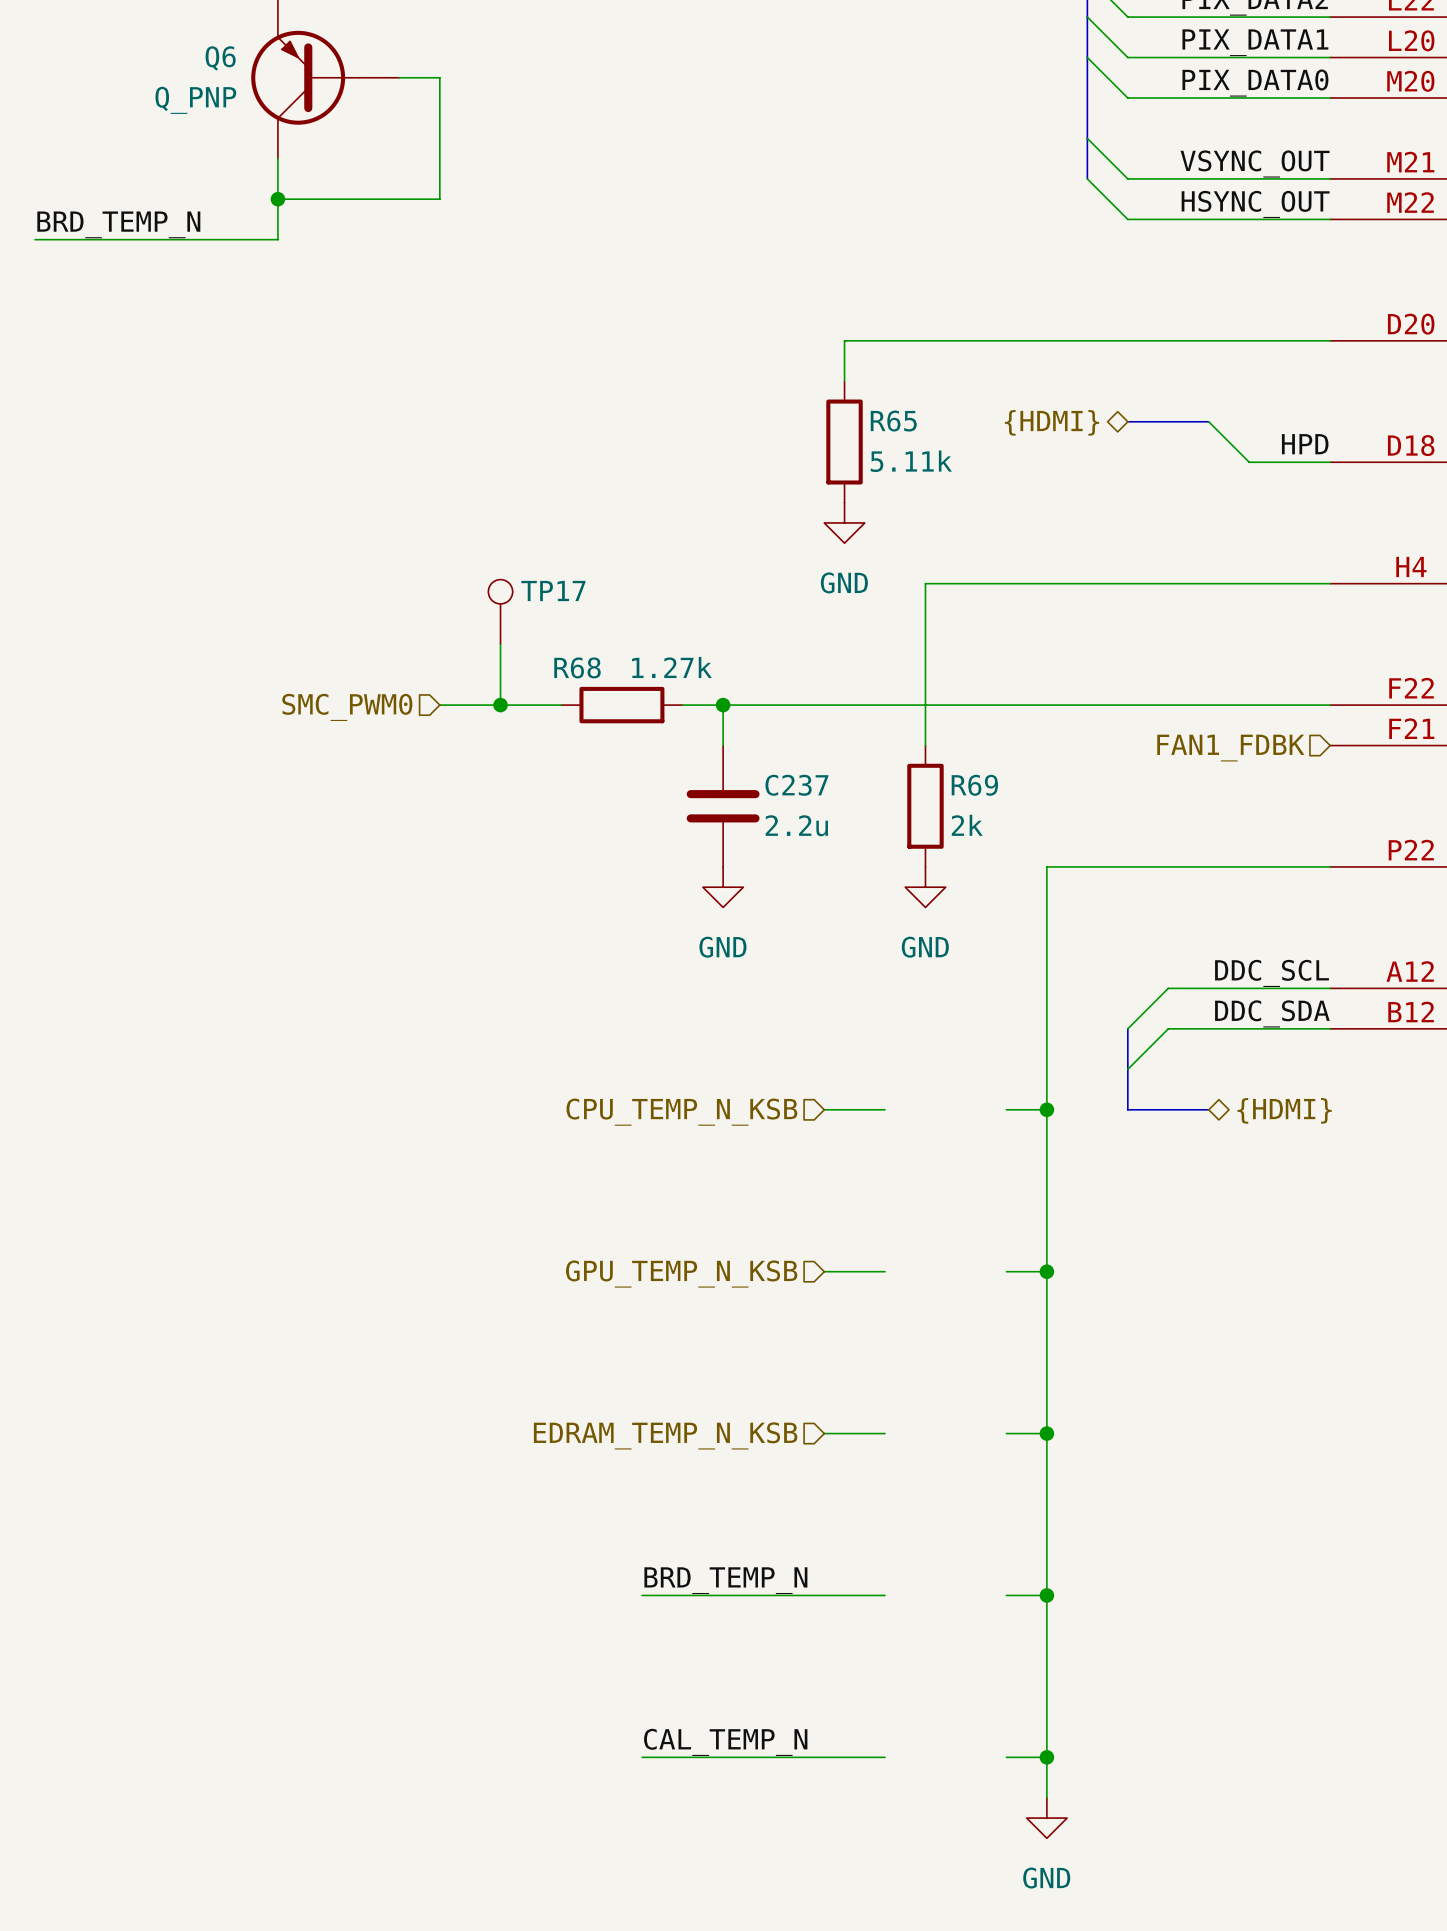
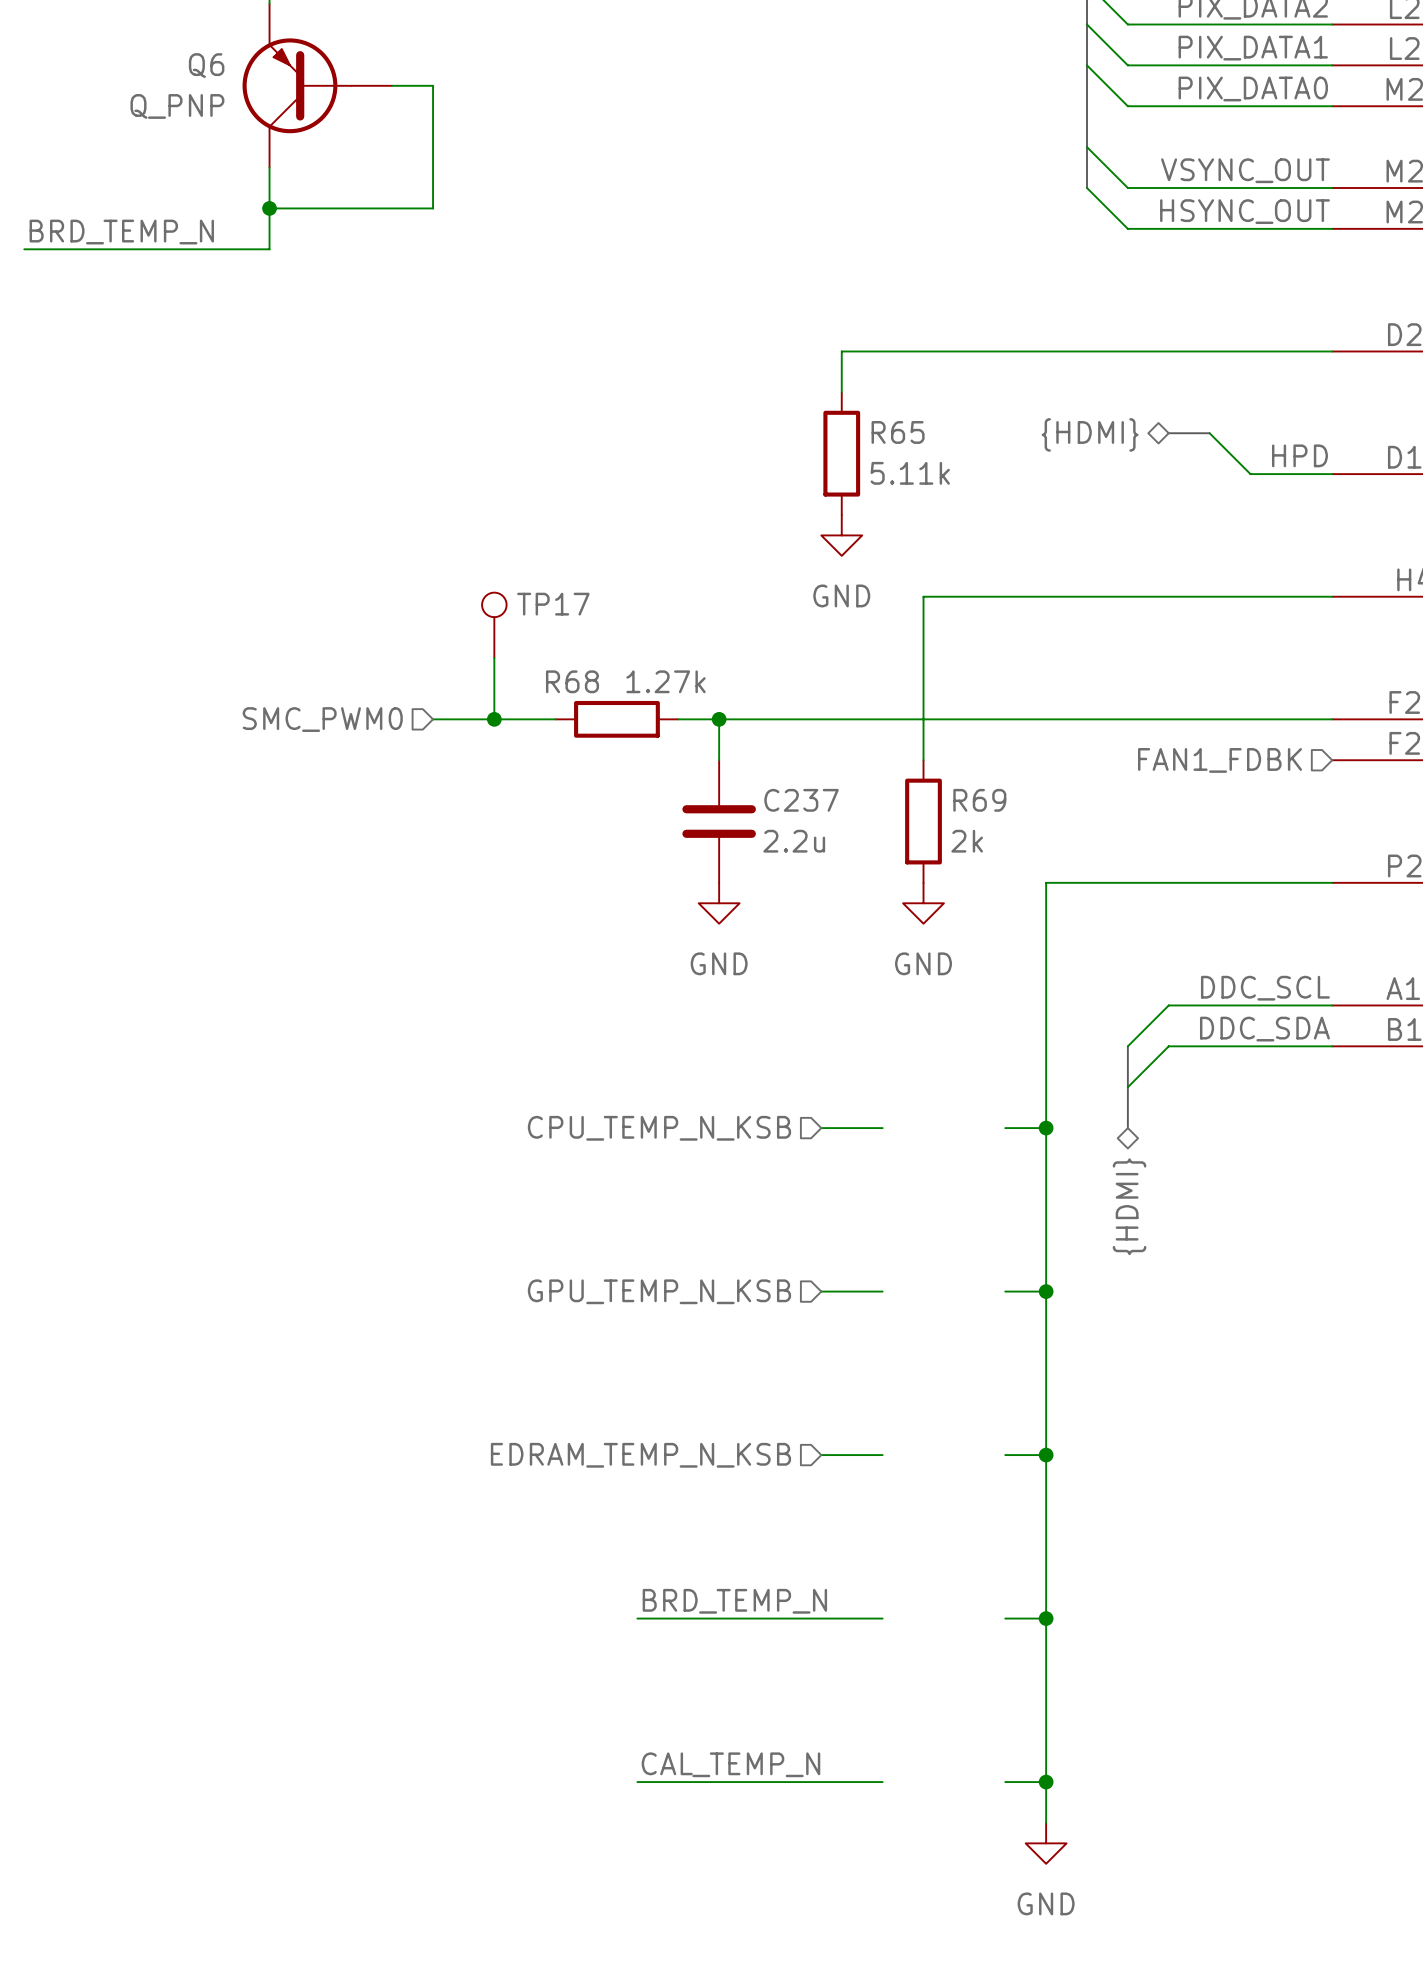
bus: (1127, 421) (1168, 421) -> none
hierarchical label position: {HDMI} (1052, 422) -> {HDMI} (1090, 434)
bus: (1127, 1109) (1208, 1109) -> none
hierarchical label rotation: 0° (1284, 1110) -> 90° clockwise (1129, 1206)
hierarchical label position: {HDMI} (1284, 1110) -> {HDMI} (1129, 1206)

